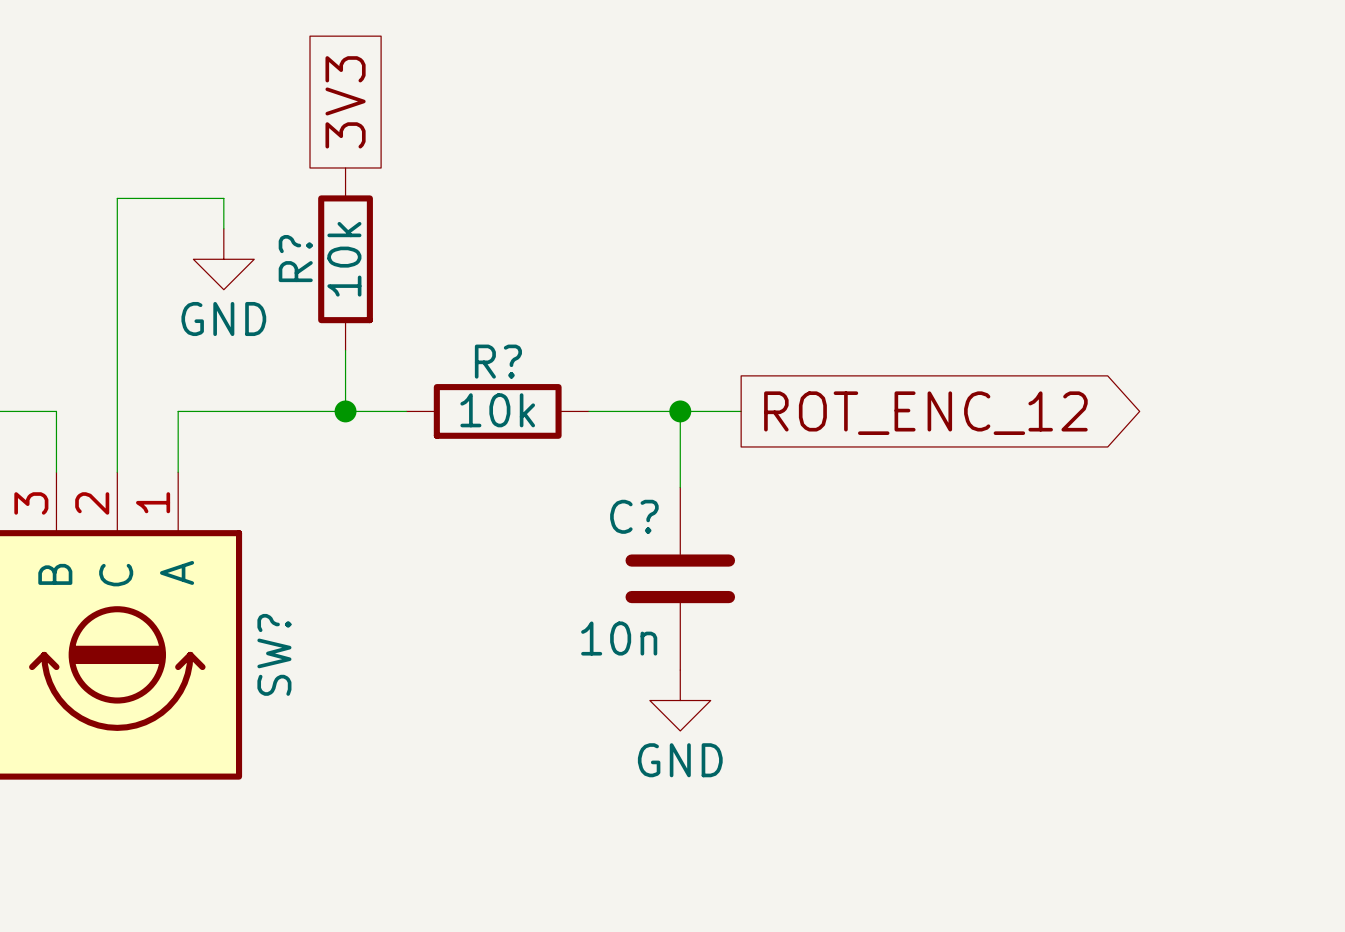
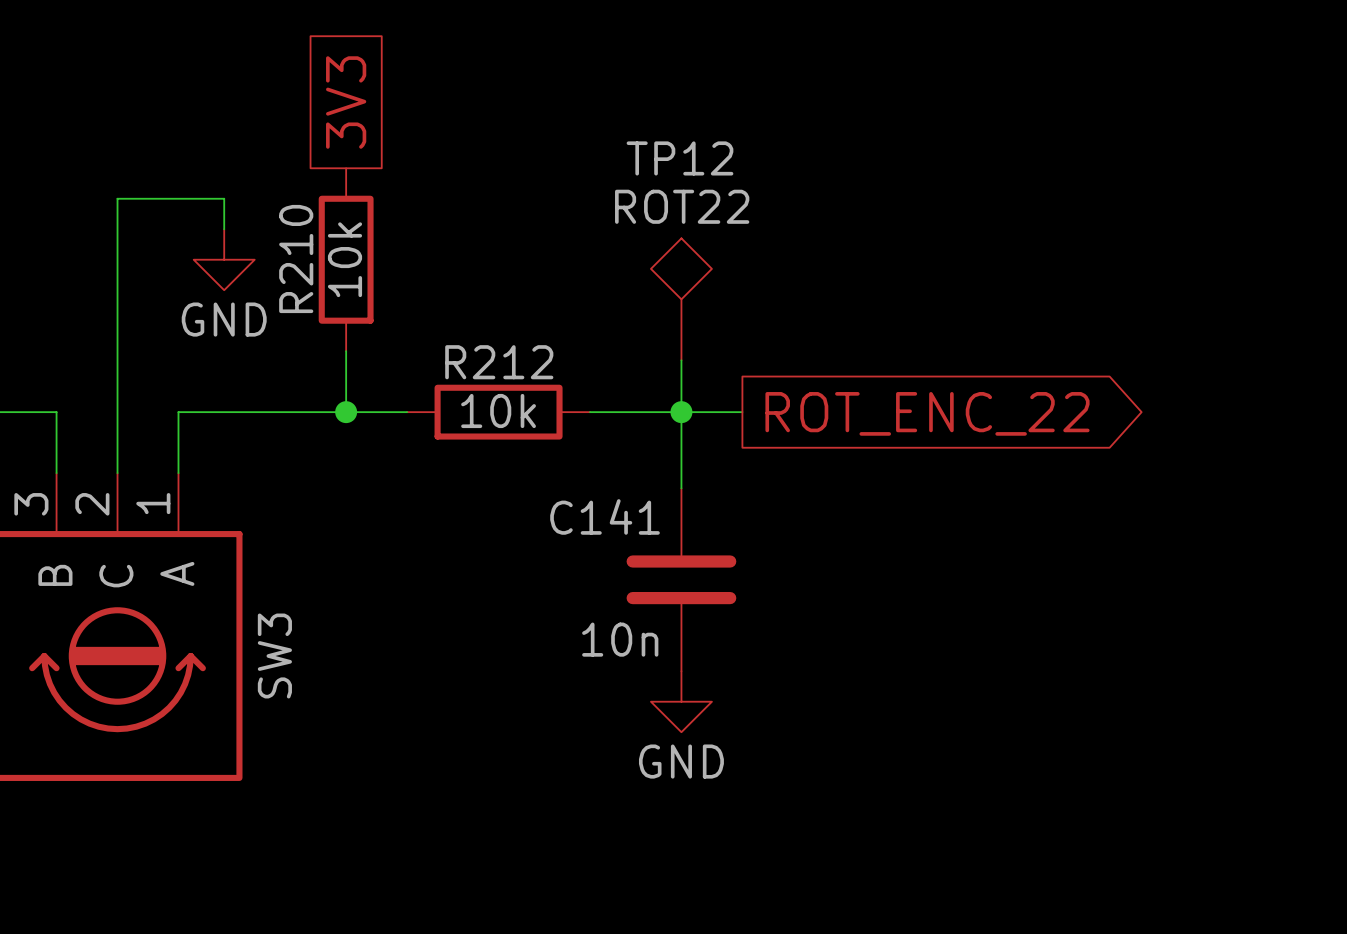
R? name: R? (295, 258) -> R210 (296, 259)
TP12: none -> ROT22 (681, 299)
wire: none -> (681, 360) (681, 412)
R? name: R? (498, 361) -> R212 (499, 362)
global label: ROT_ENC_12 (925, 413) -> ROT_ENC_22 (927, 413)
C? name: C? (634, 516) -> C141 (605, 516)
SW? name: SW? (274, 654) -> SW3 (274, 656)

